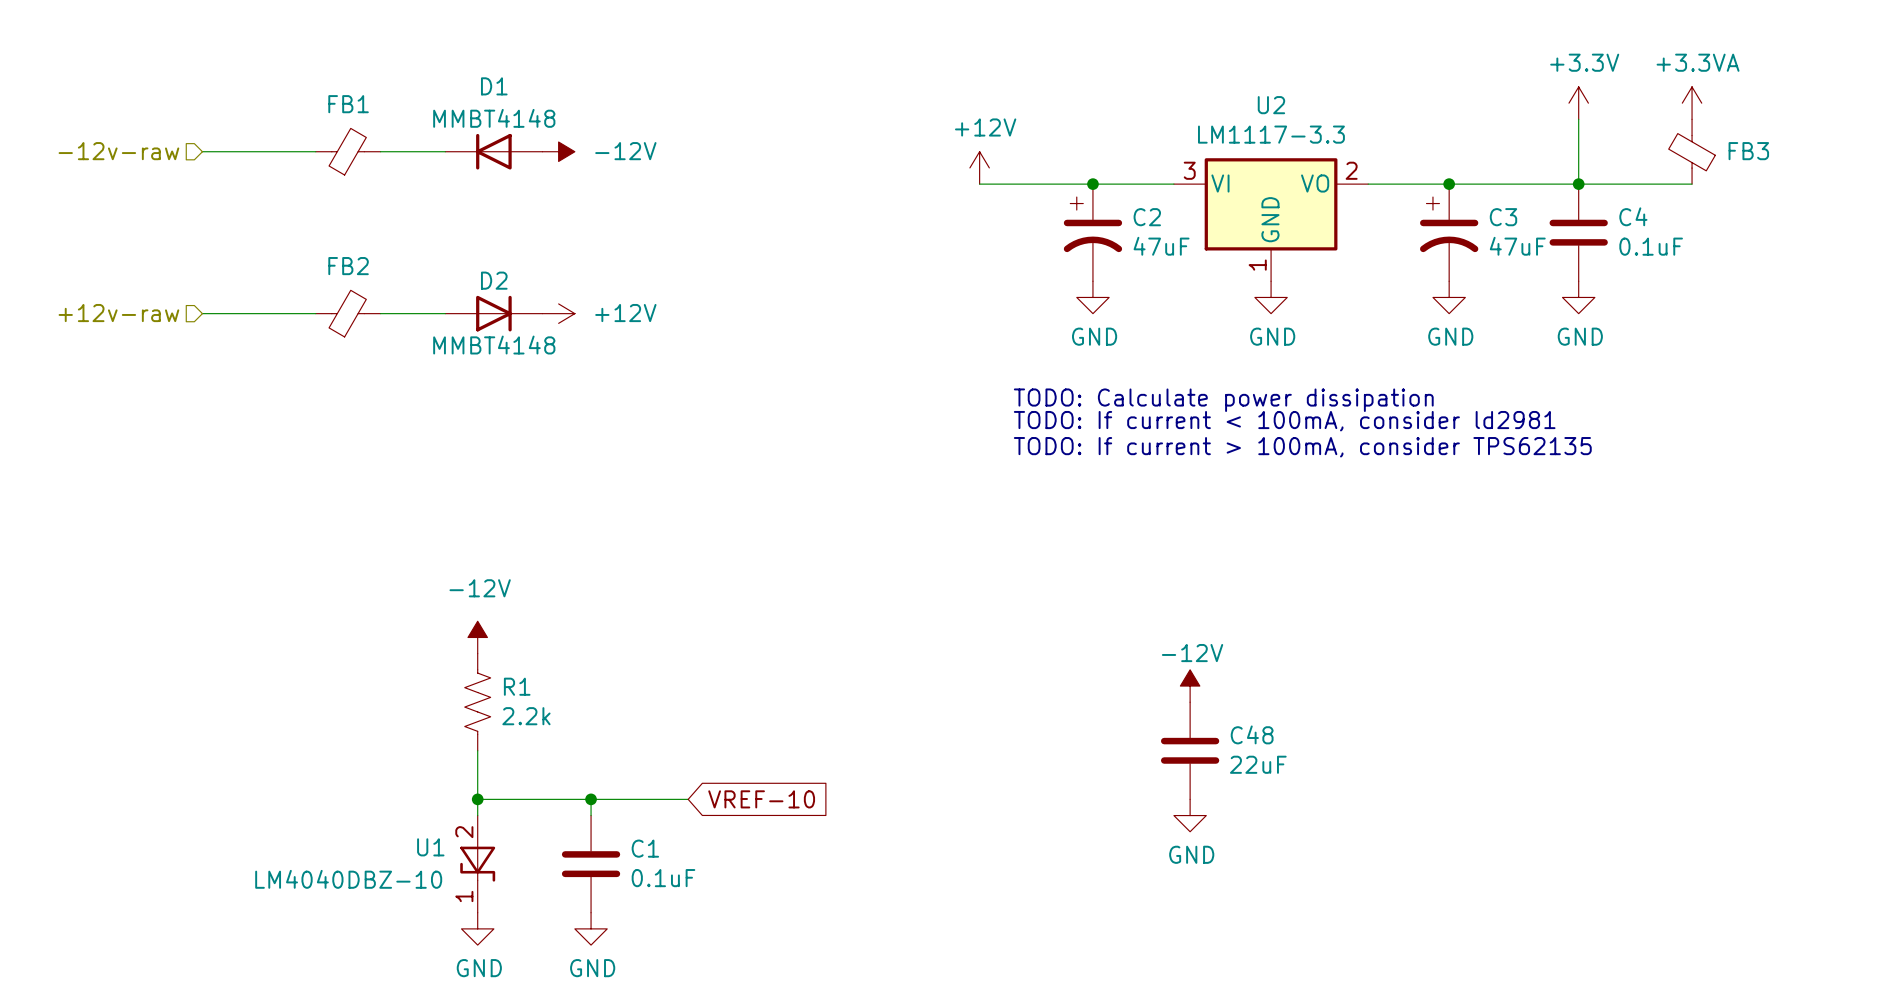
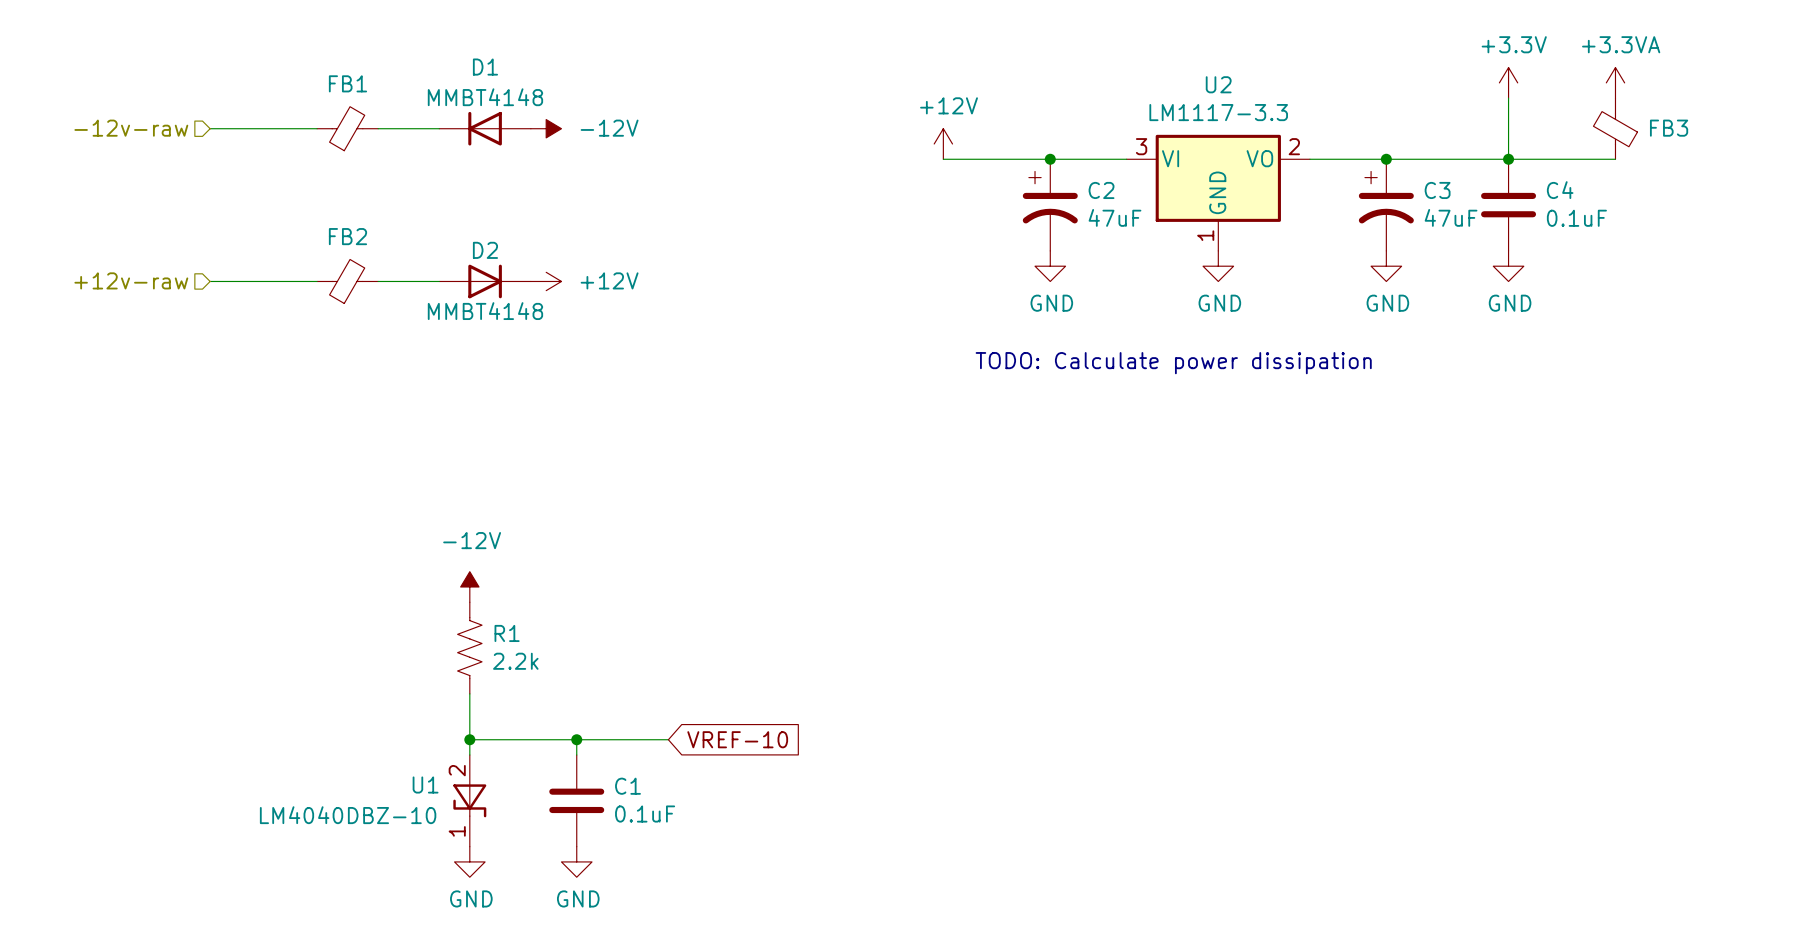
text: TODO: If current < 100mA, consider ld2981 (1284, 421) -> none
text: TODO: If current > 100mA, consider TPS62135 (1302, 447) -> none
power symbol: -12V (1190, 686) -> none
C48: 22uF (1190, 750) -> none
power symbol: GND (1190, 815) -> none

